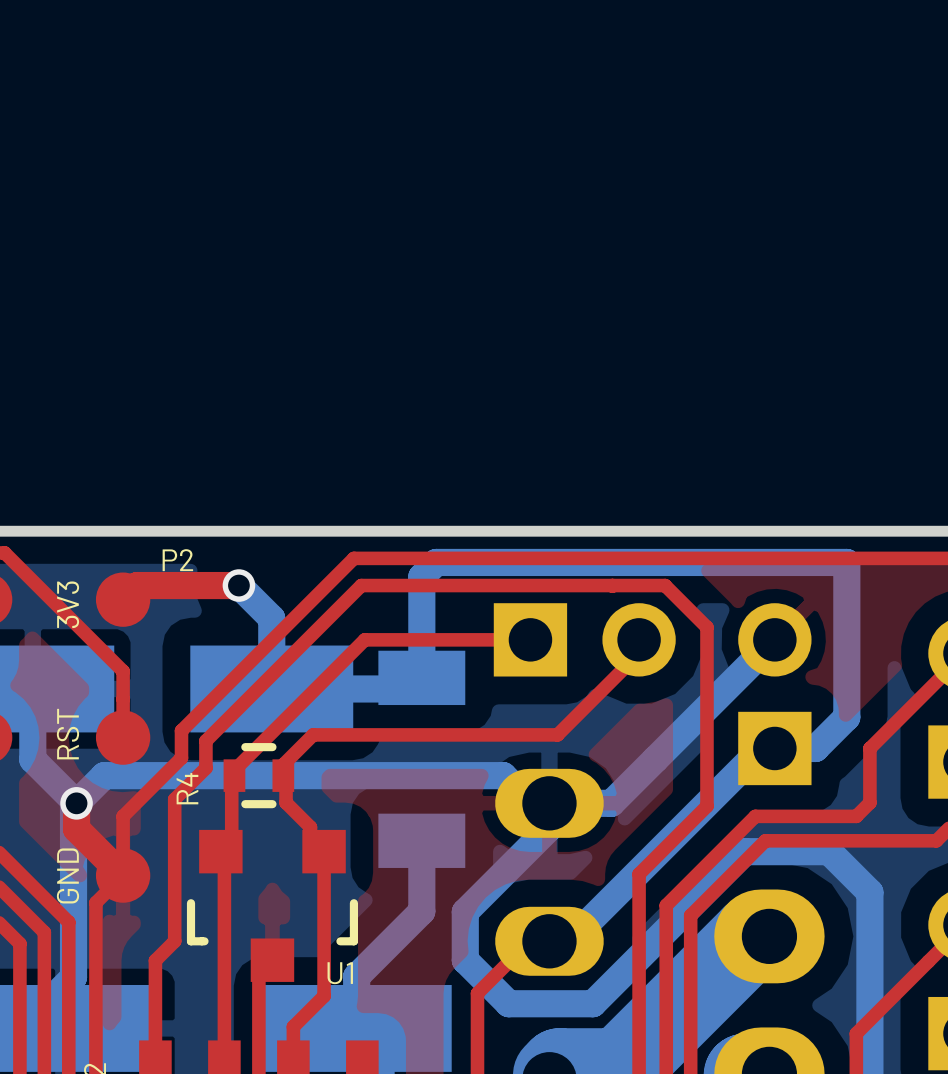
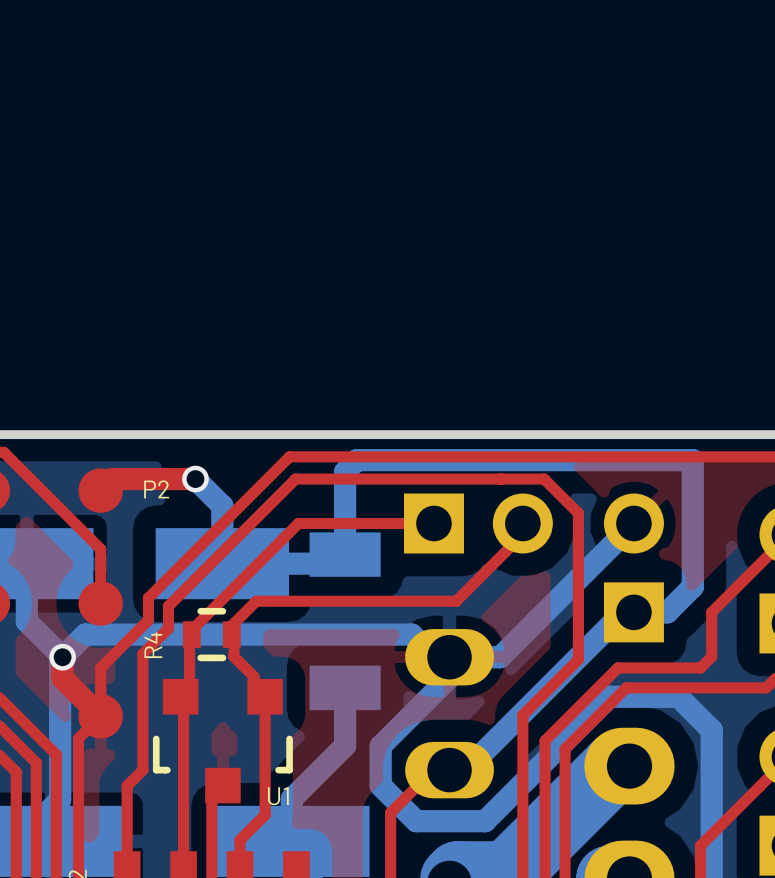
P2 name position: P2 (177, 560) -> P2 (156, 489)
text: 3V3 (68, 604) -> none
text: RST (67, 734) -> none
text: GND (67, 875) -> none

